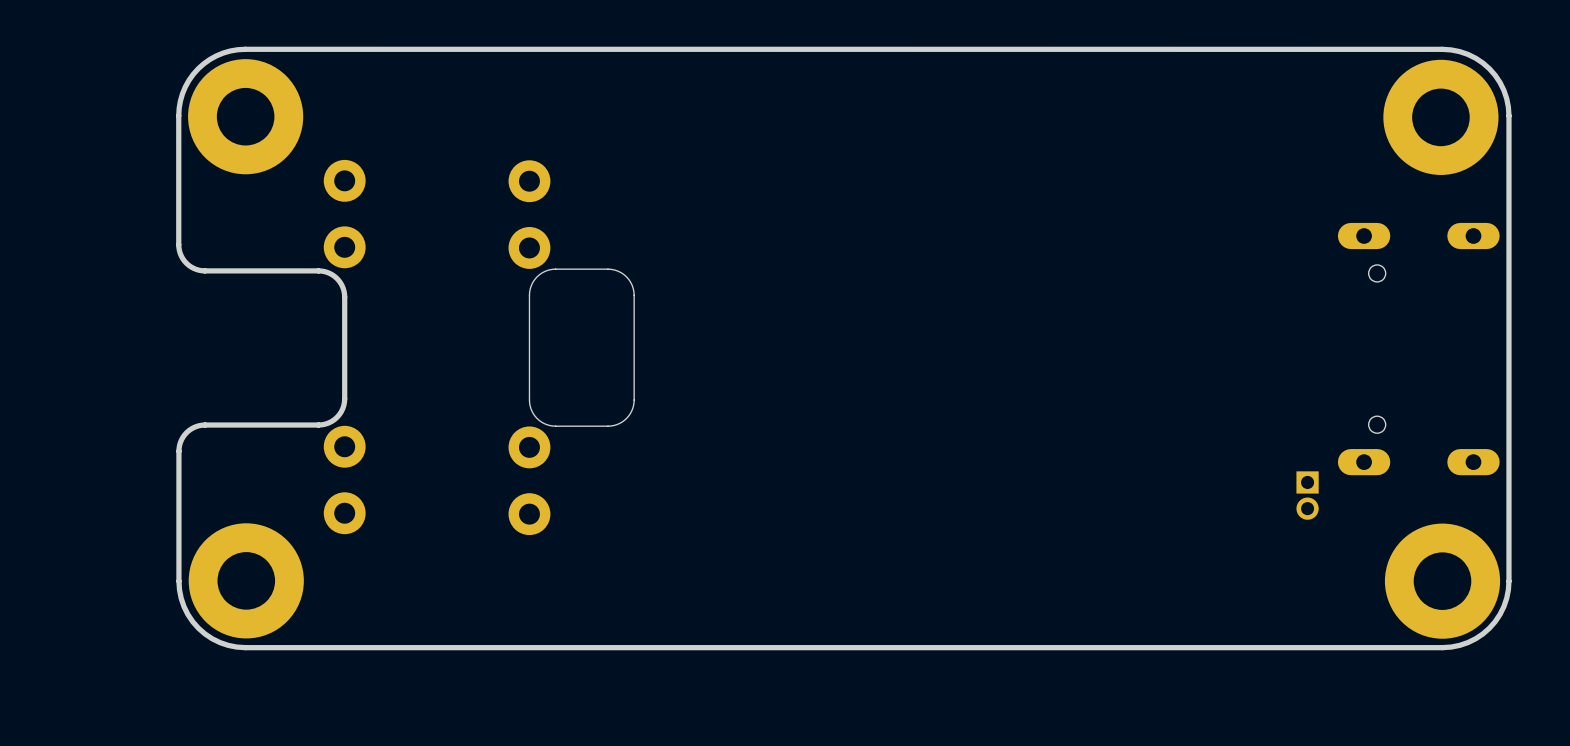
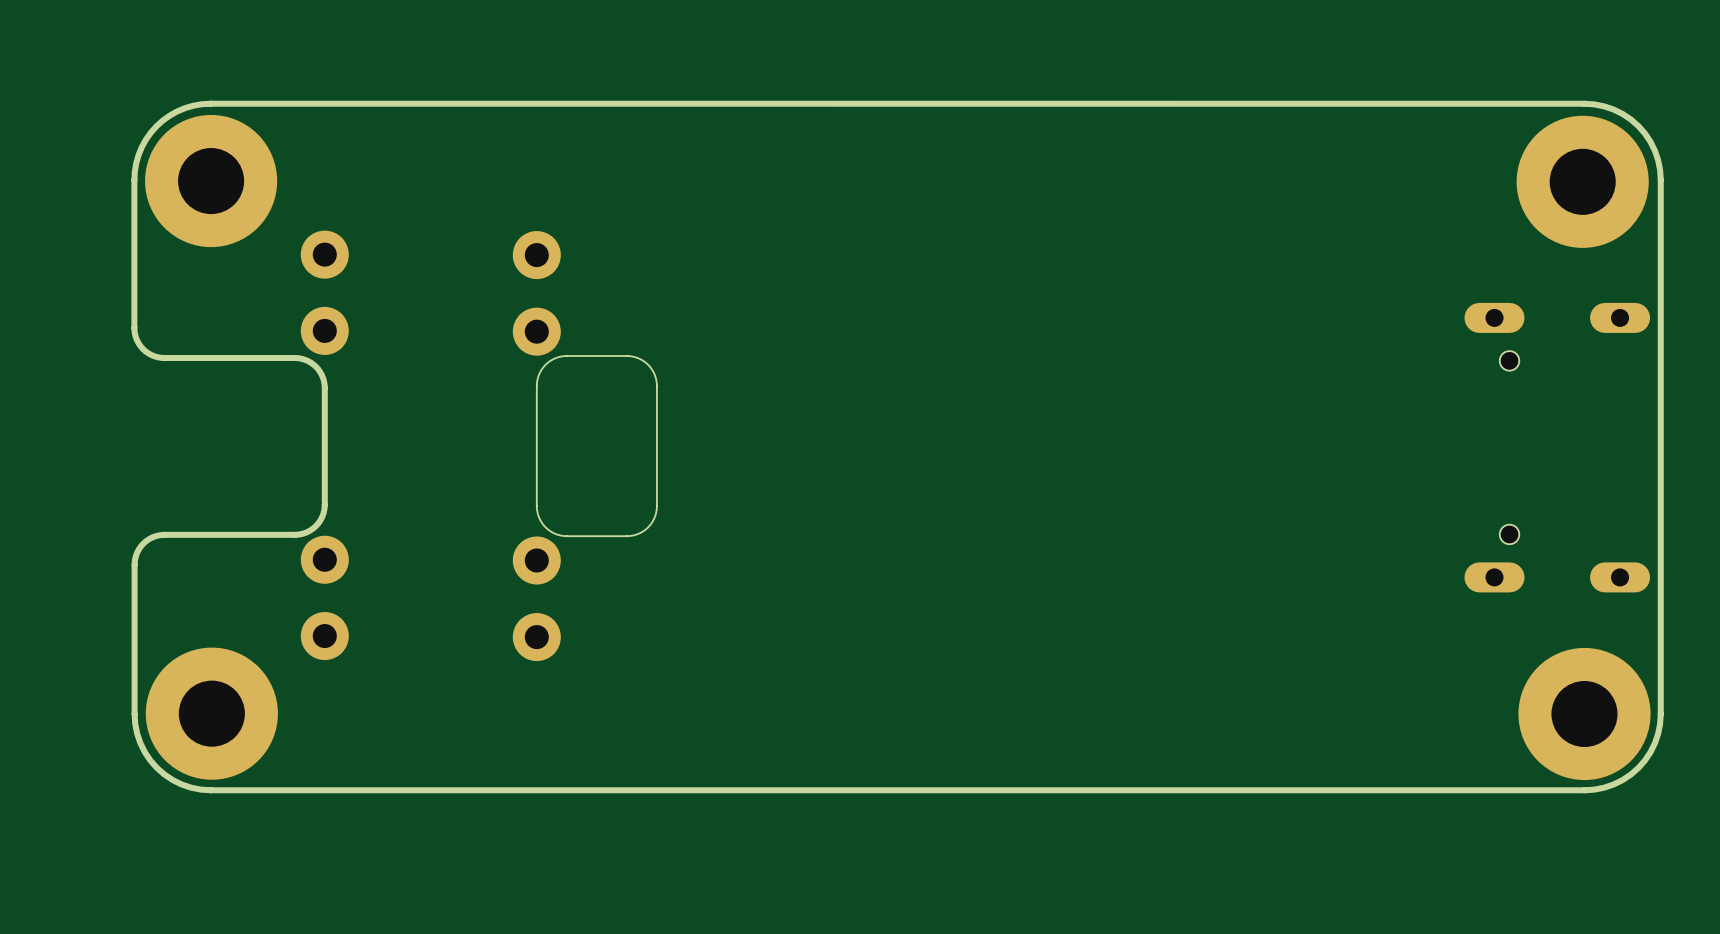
part: (1307, 495) -> none

